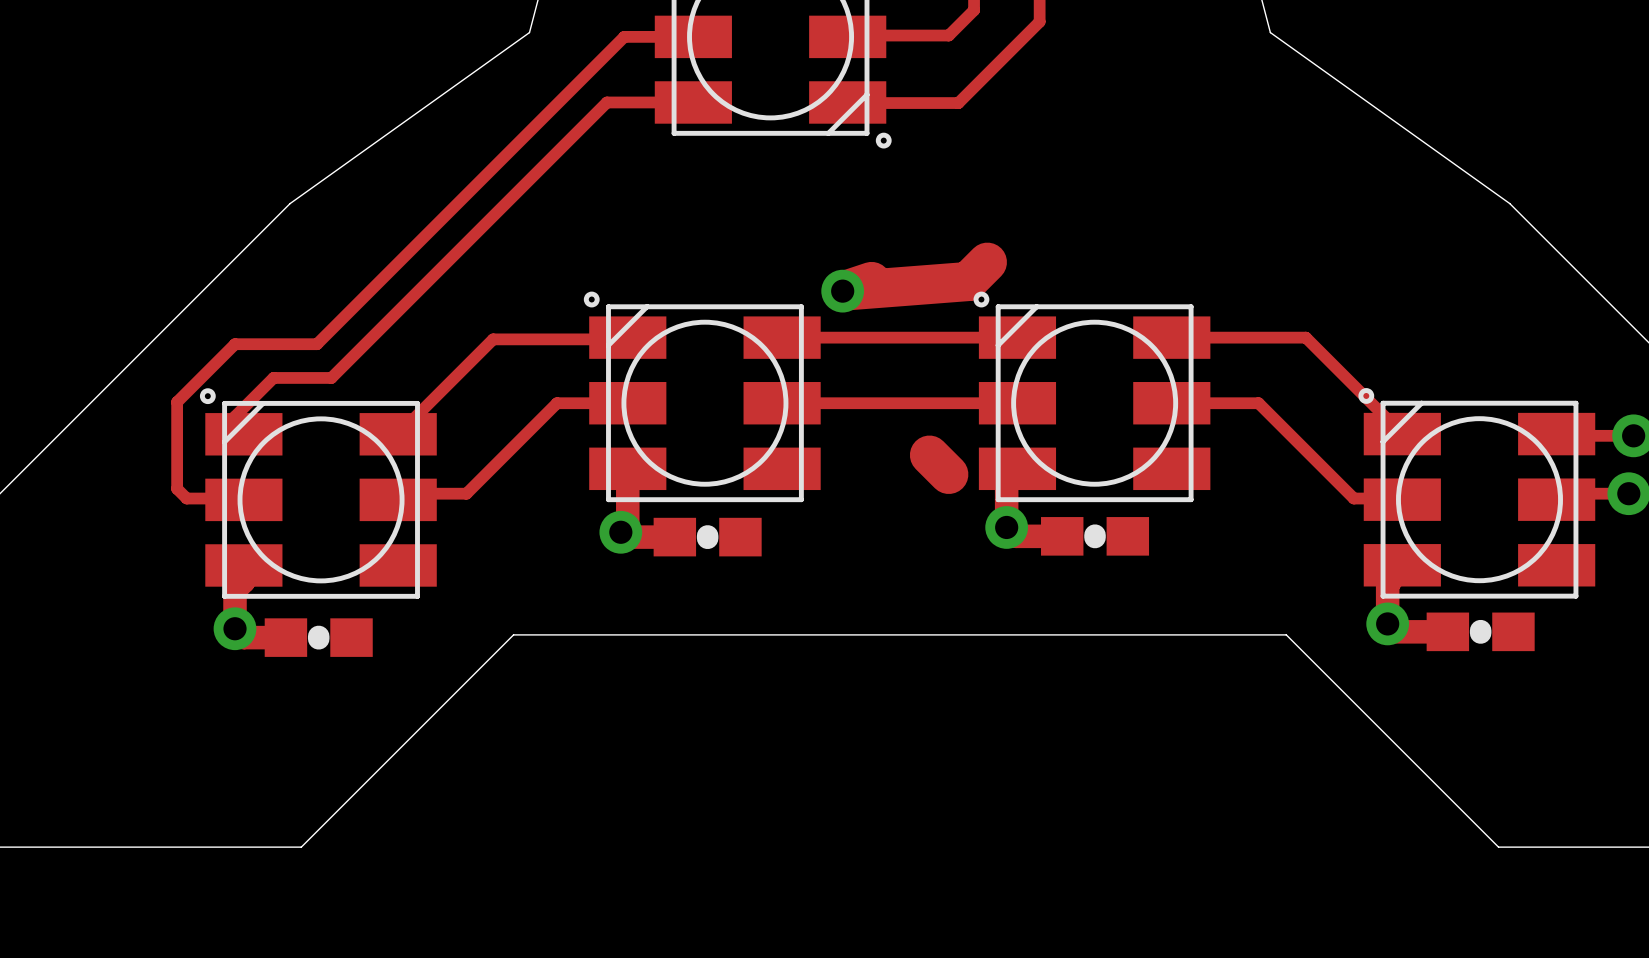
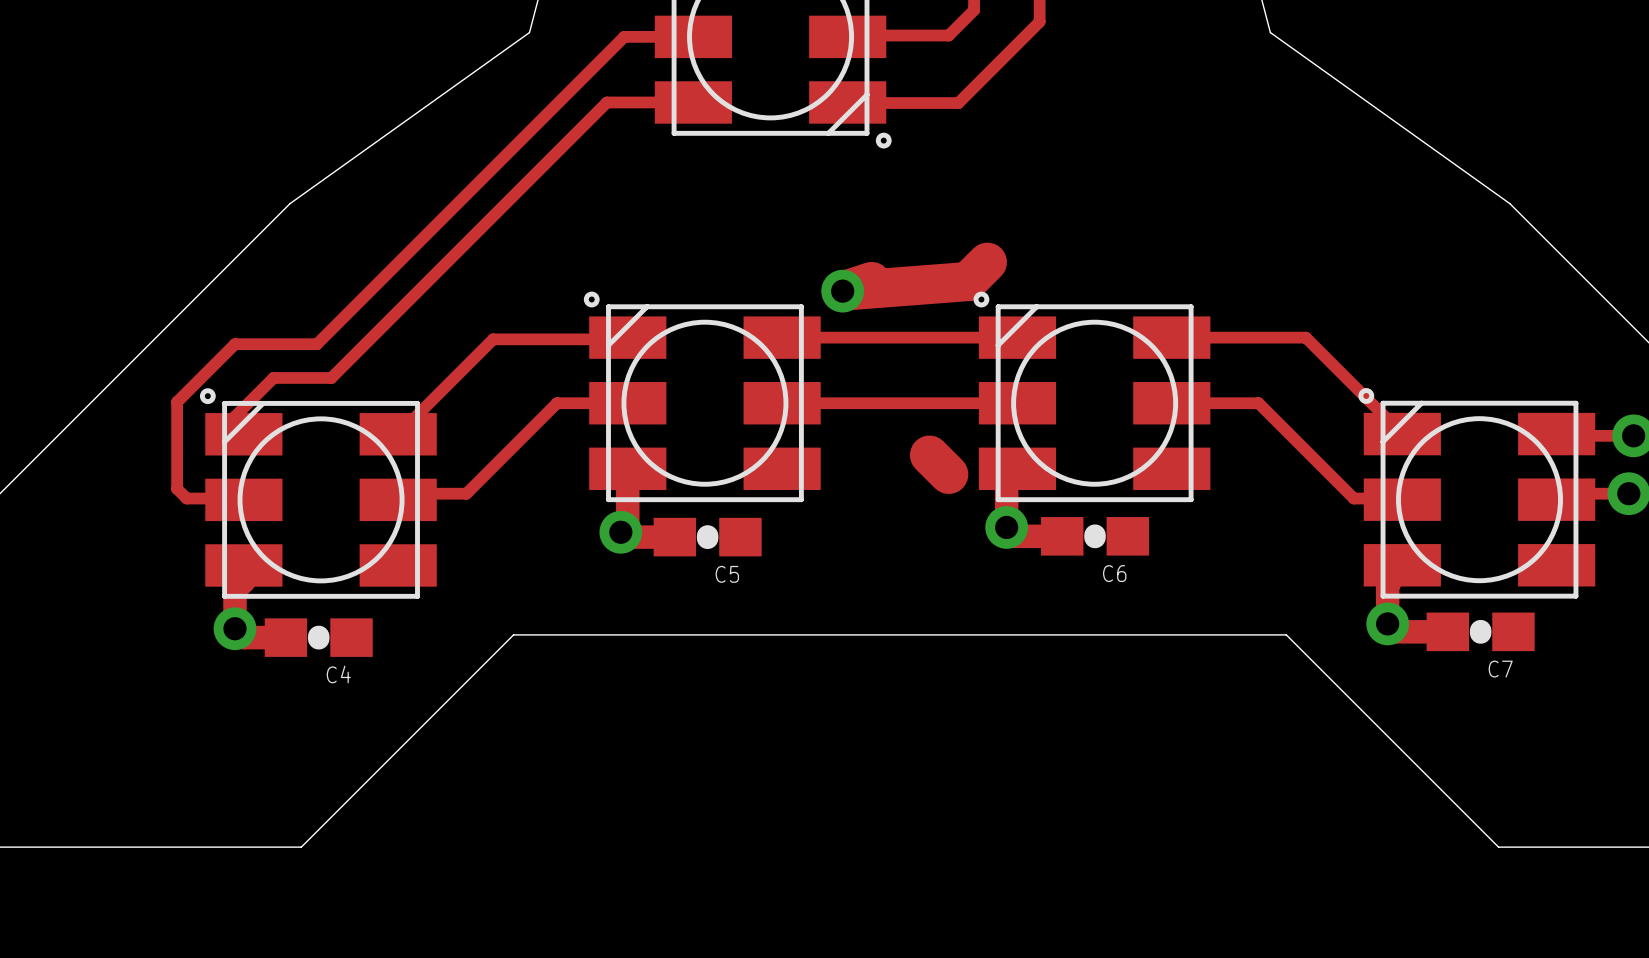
C6 name: none -> C6 (1114, 573)
C5 name: none -> C5 (727, 574)
C7 name: none -> C7 (1500, 669)
C4 name: none -> C4 (338, 674)

